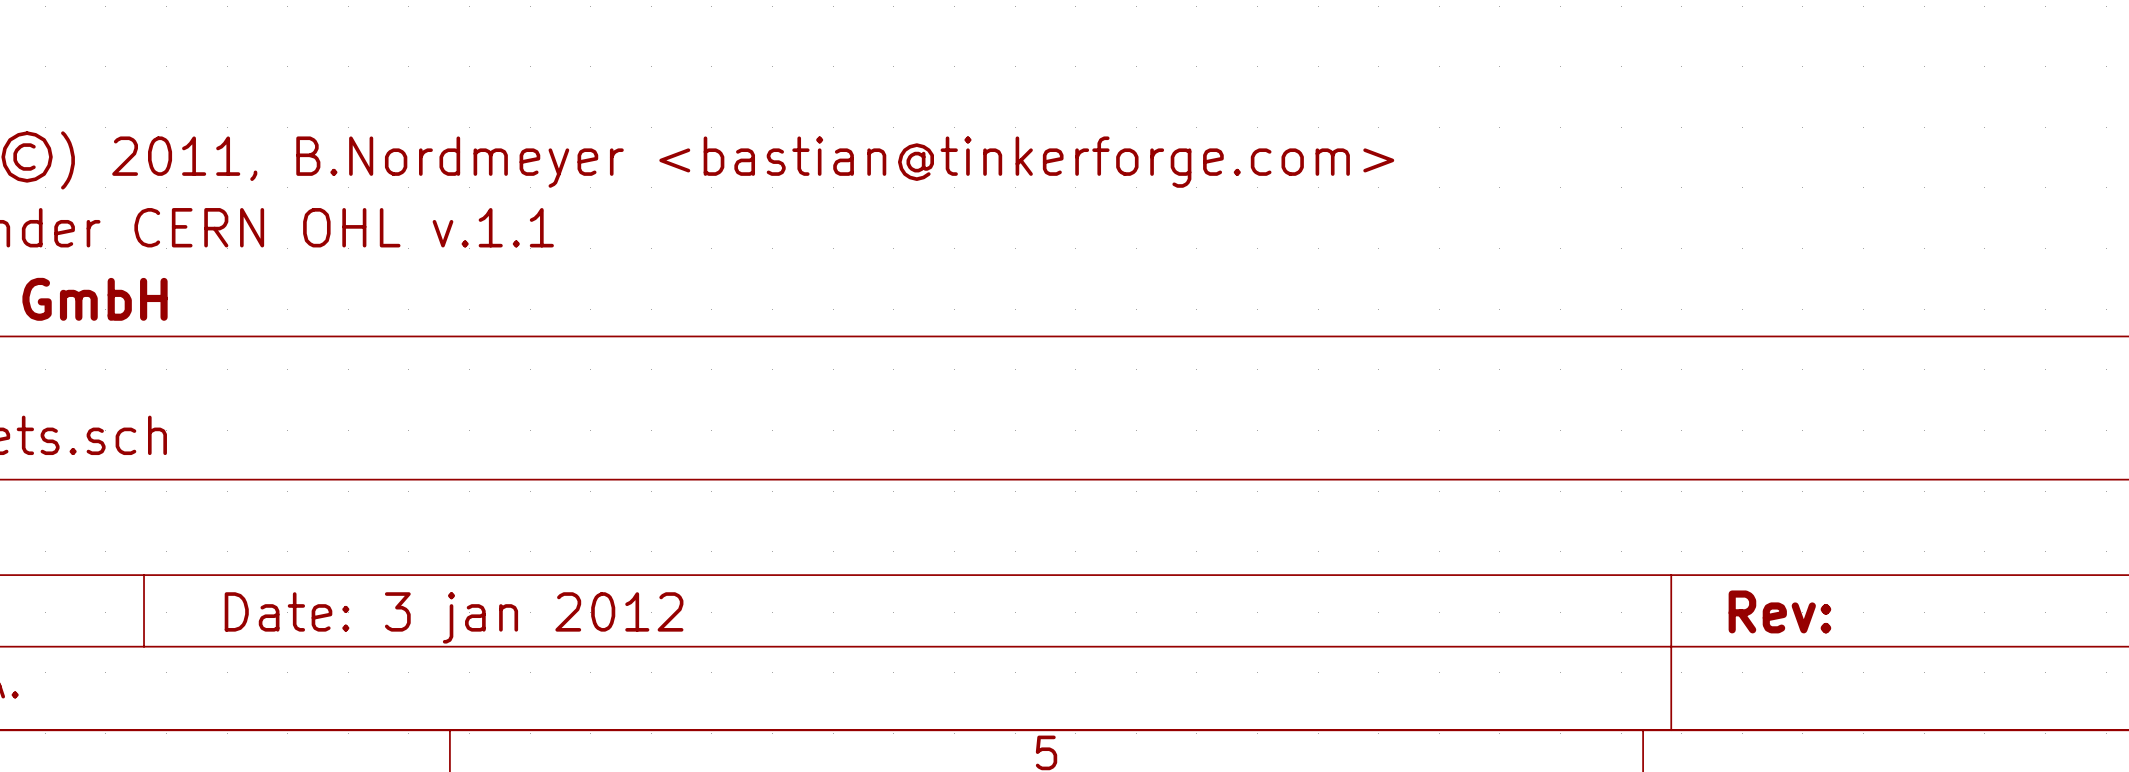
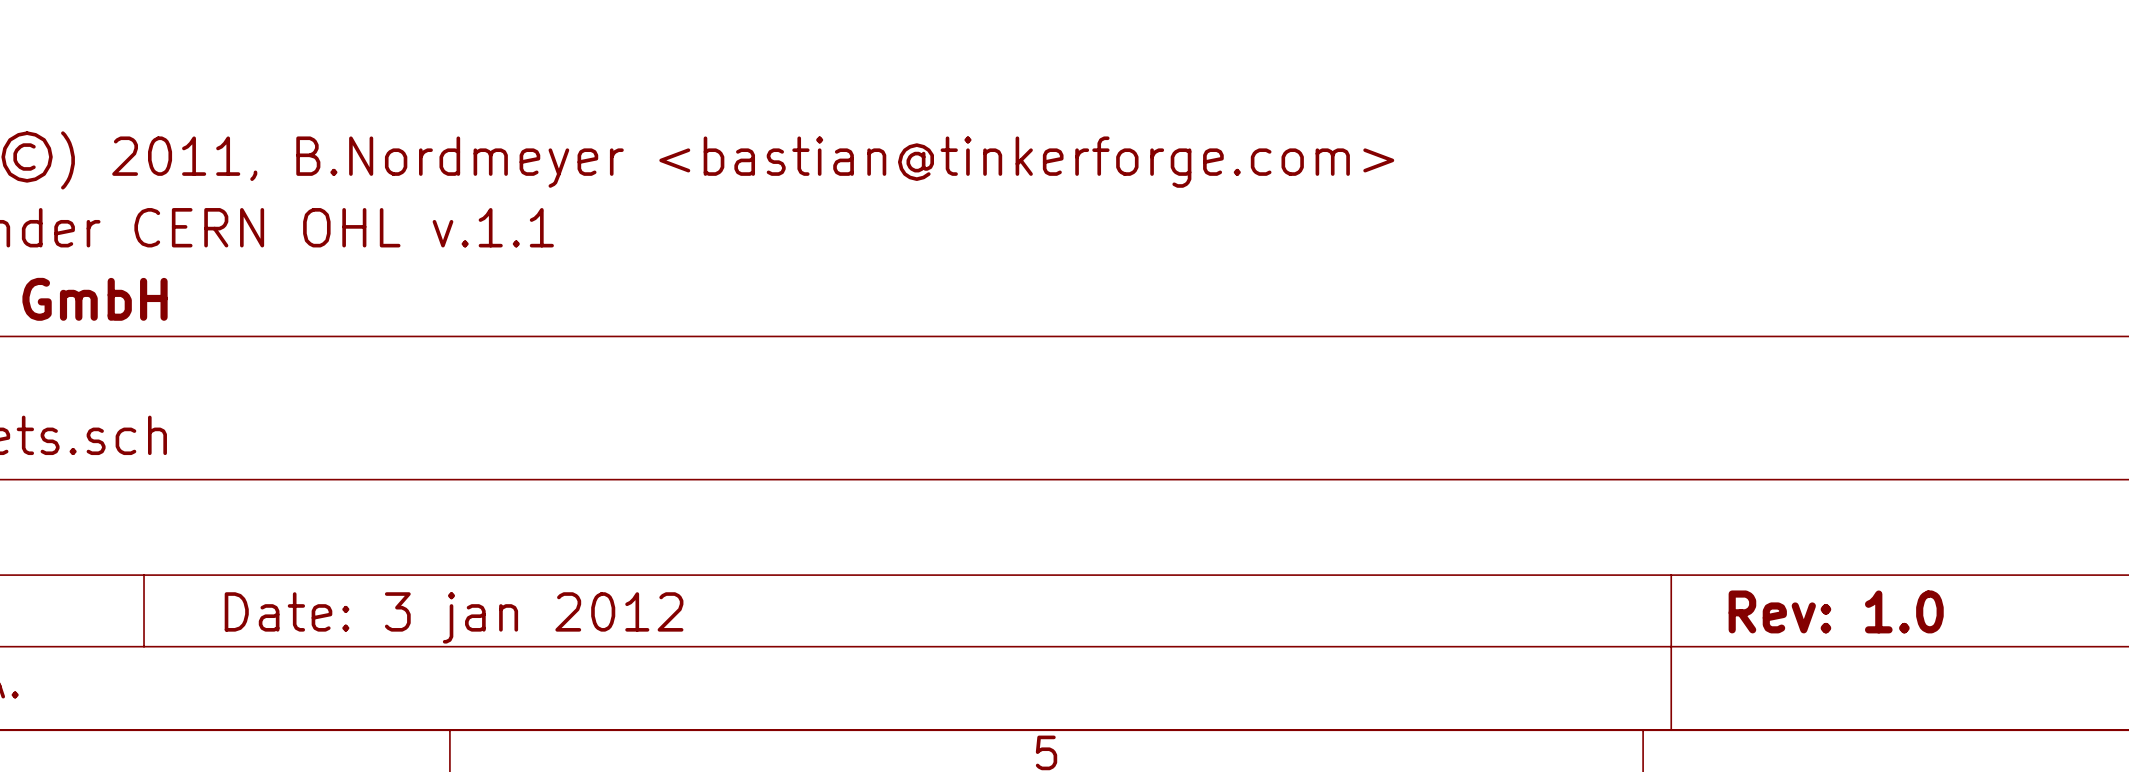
title block: Rev: (1779, 611) -> Rev: 1.0 (1836, 611)

